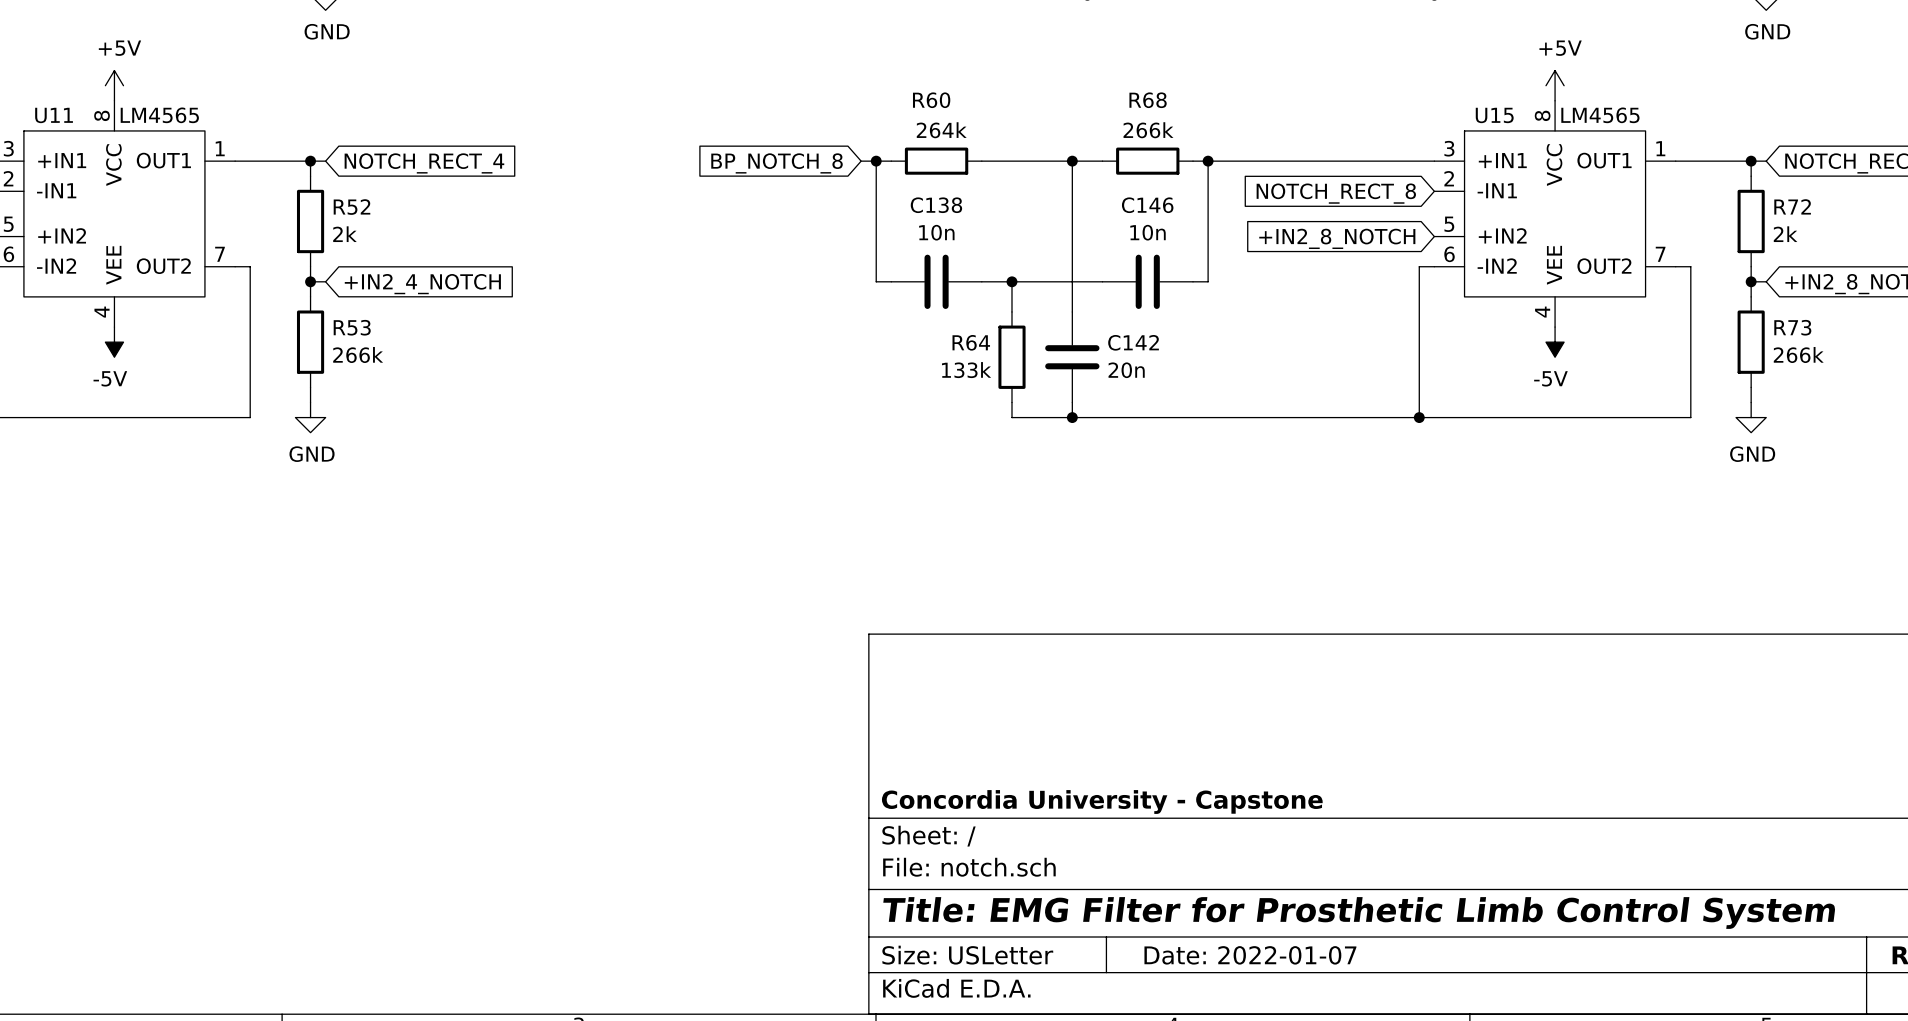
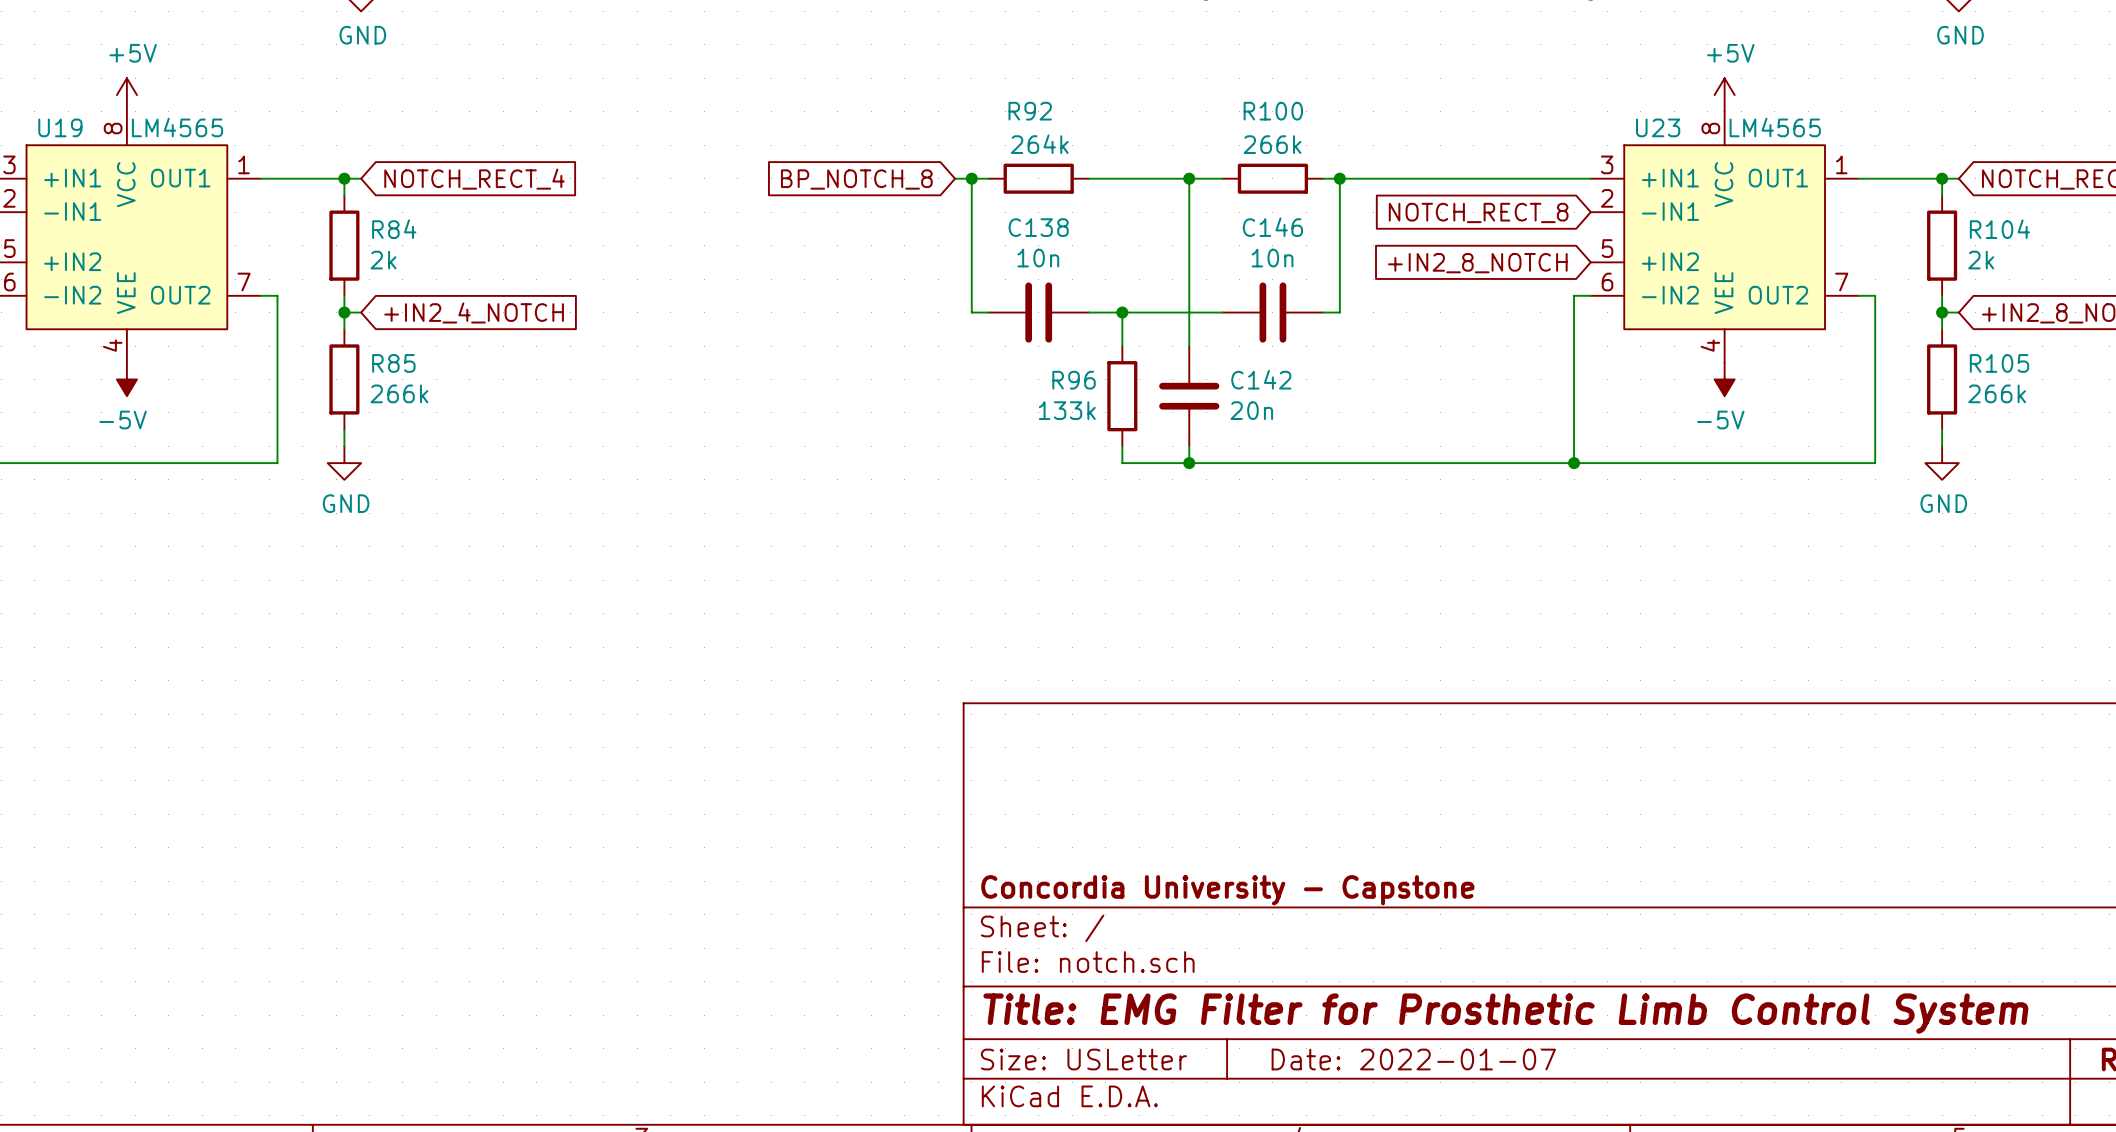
R60 name: R60 (931, 100) -> R92 (1030, 111)
R68 name: R68 (1148, 100) -> R100 (1273, 111)
U11 name: U11 (54, 115) -> U19 (60, 127)
U15 name: U15 (1494, 115) -> U23 (1658, 127)
R72 name: R72 (1792, 206) -> R104 (1999, 229)
R52 name: R52 (351, 207) -> R84 (394, 229)
R53 name: R53 (352, 327) -> R85 (393, 363)
R73 name: R73 (1792, 327) -> R105 (1999, 363)
R64 name: R64 (971, 342) -> R96 (1074, 380)

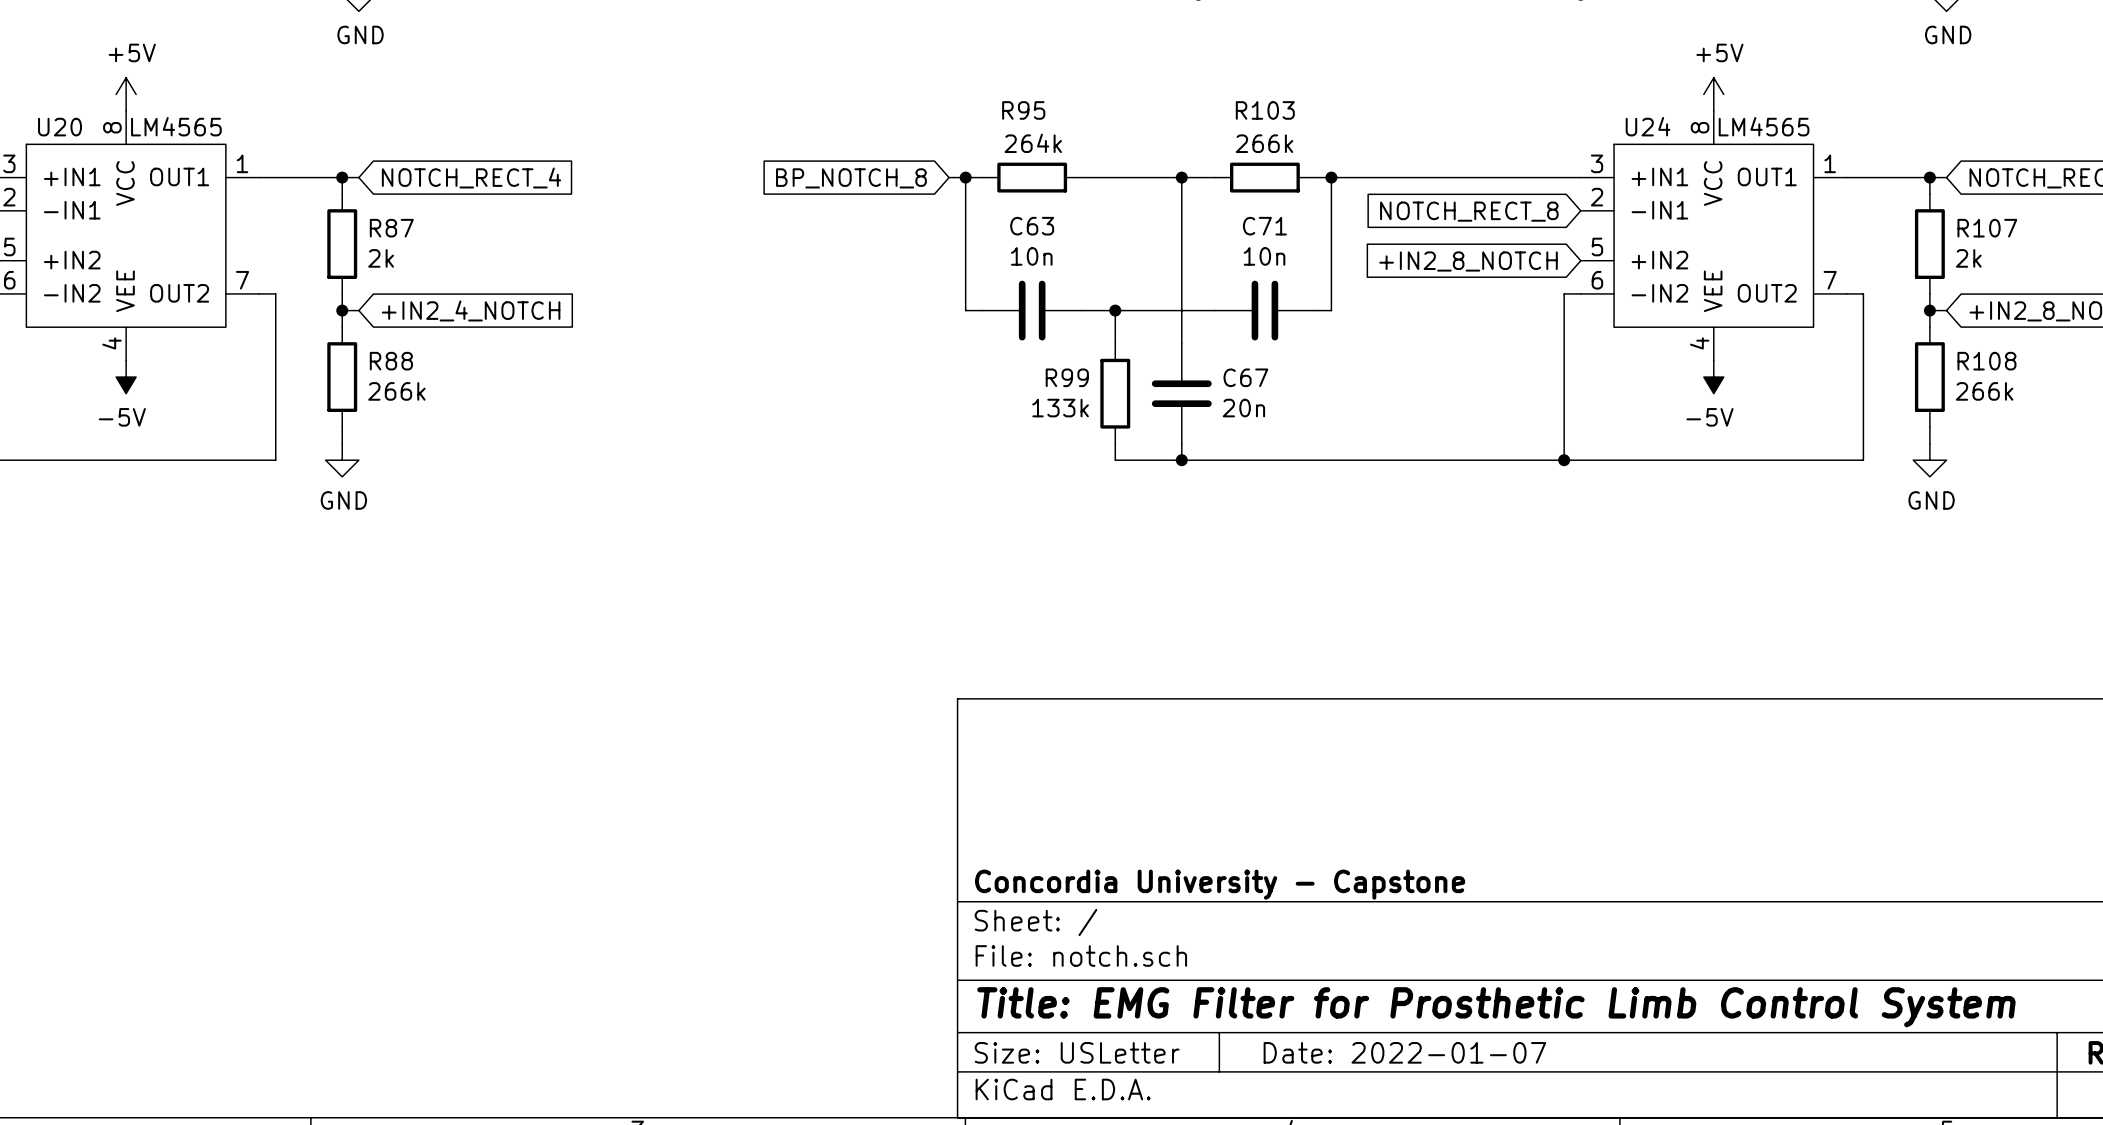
R92 name: R92 (1030, 111) -> R95 (1023, 110)
R100 name: R100 (1273, 111) -> R103 (1265, 110)
U19 name: U19 (60, 127) -> U20 (60, 127)
U23 name: U23 (1658, 127) -> U24 (1648, 126)
C138 name: C138 (1038, 227) -> C63 (1032, 226)
C146 name: C146 (1272, 227) -> C71 (1264, 226)
R84 name: R84 (394, 229) -> R87 (391, 228)
R104 name: R104 (1999, 229) -> R107 (1987, 228)
R85 name: R85 (393, 363) -> R88 (391, 361)
R105 name: R105 (1999, 363) -> R108 (1986, 361)
C142 name: C142 (1261, 379) -> C67 (1245, 377)
R96 name: R96 (1074, 380) -> R99 (1067, 377)

